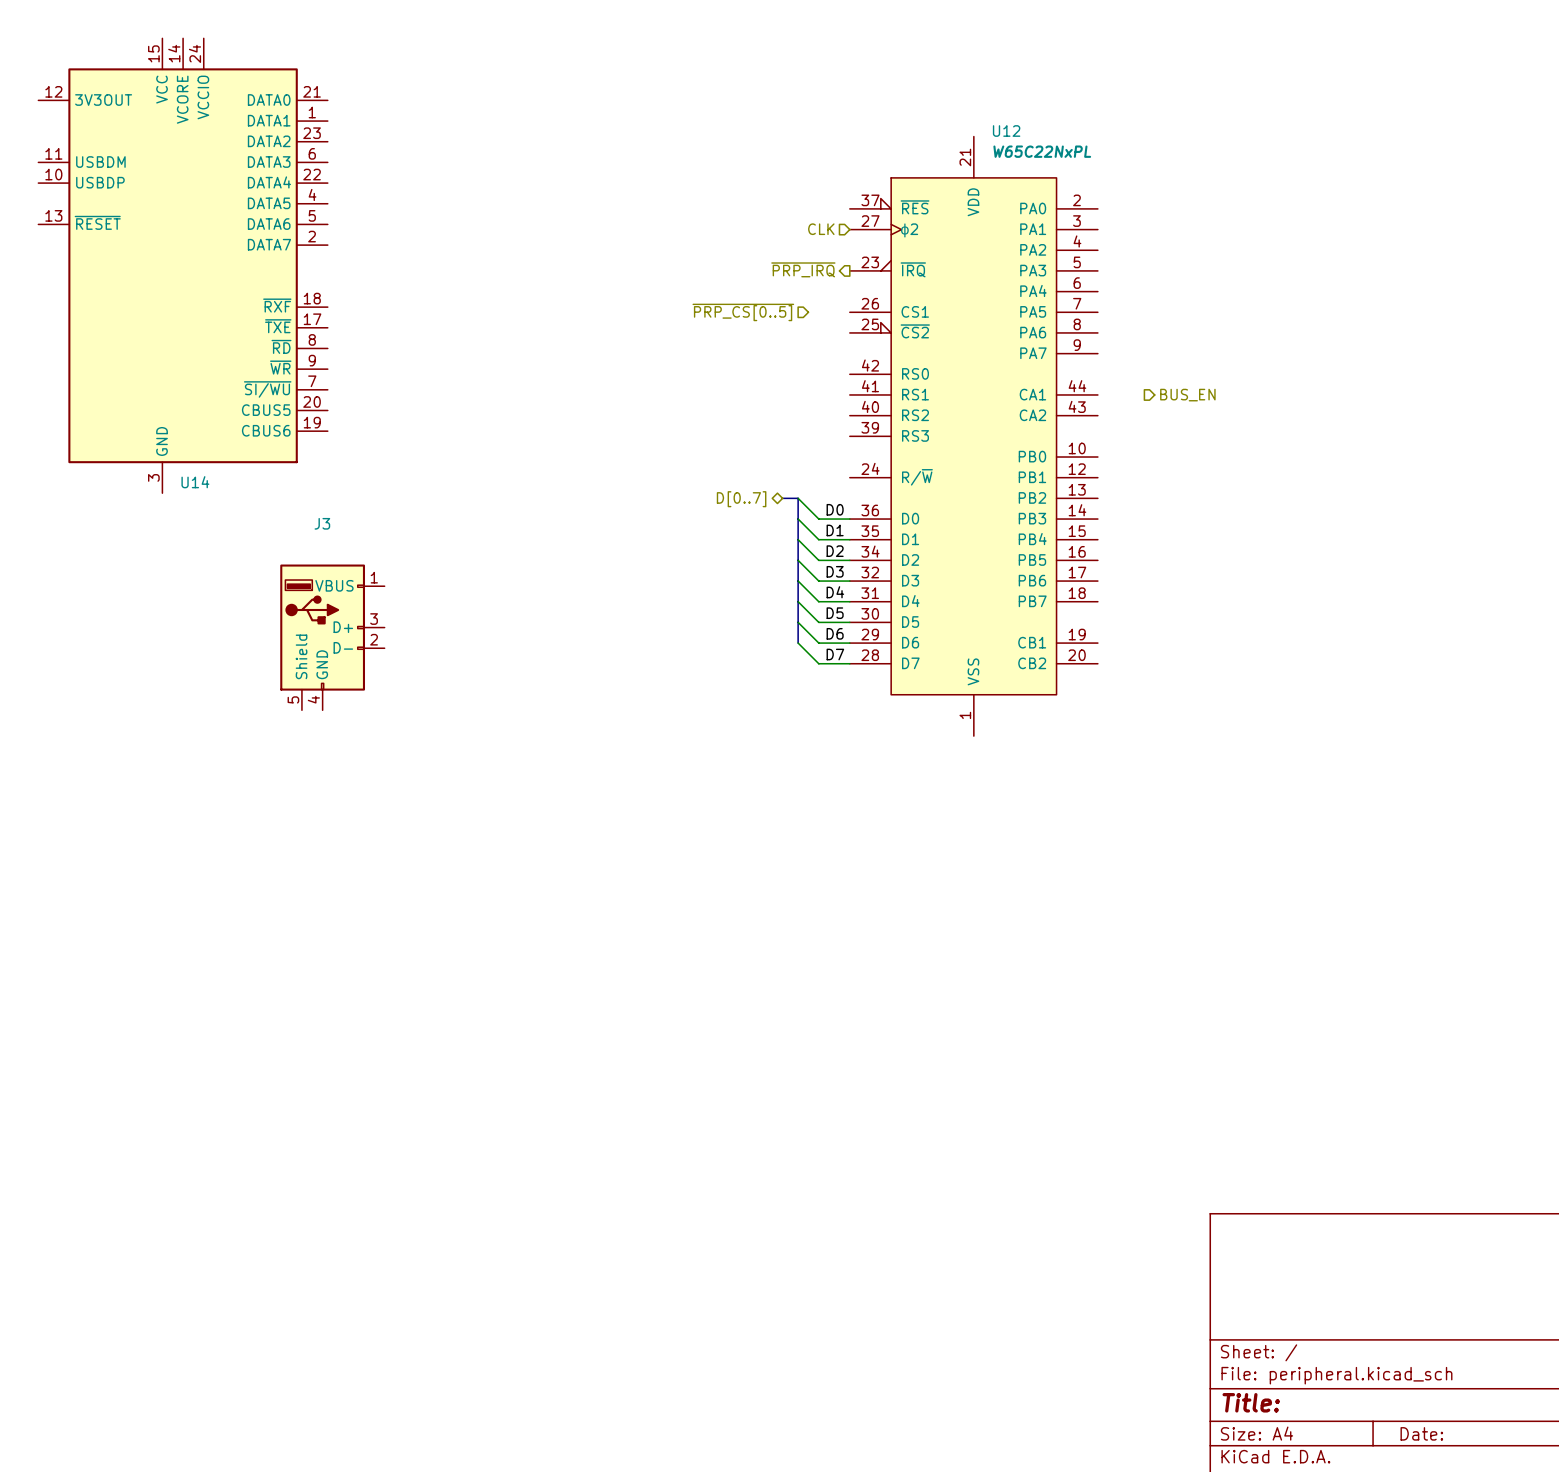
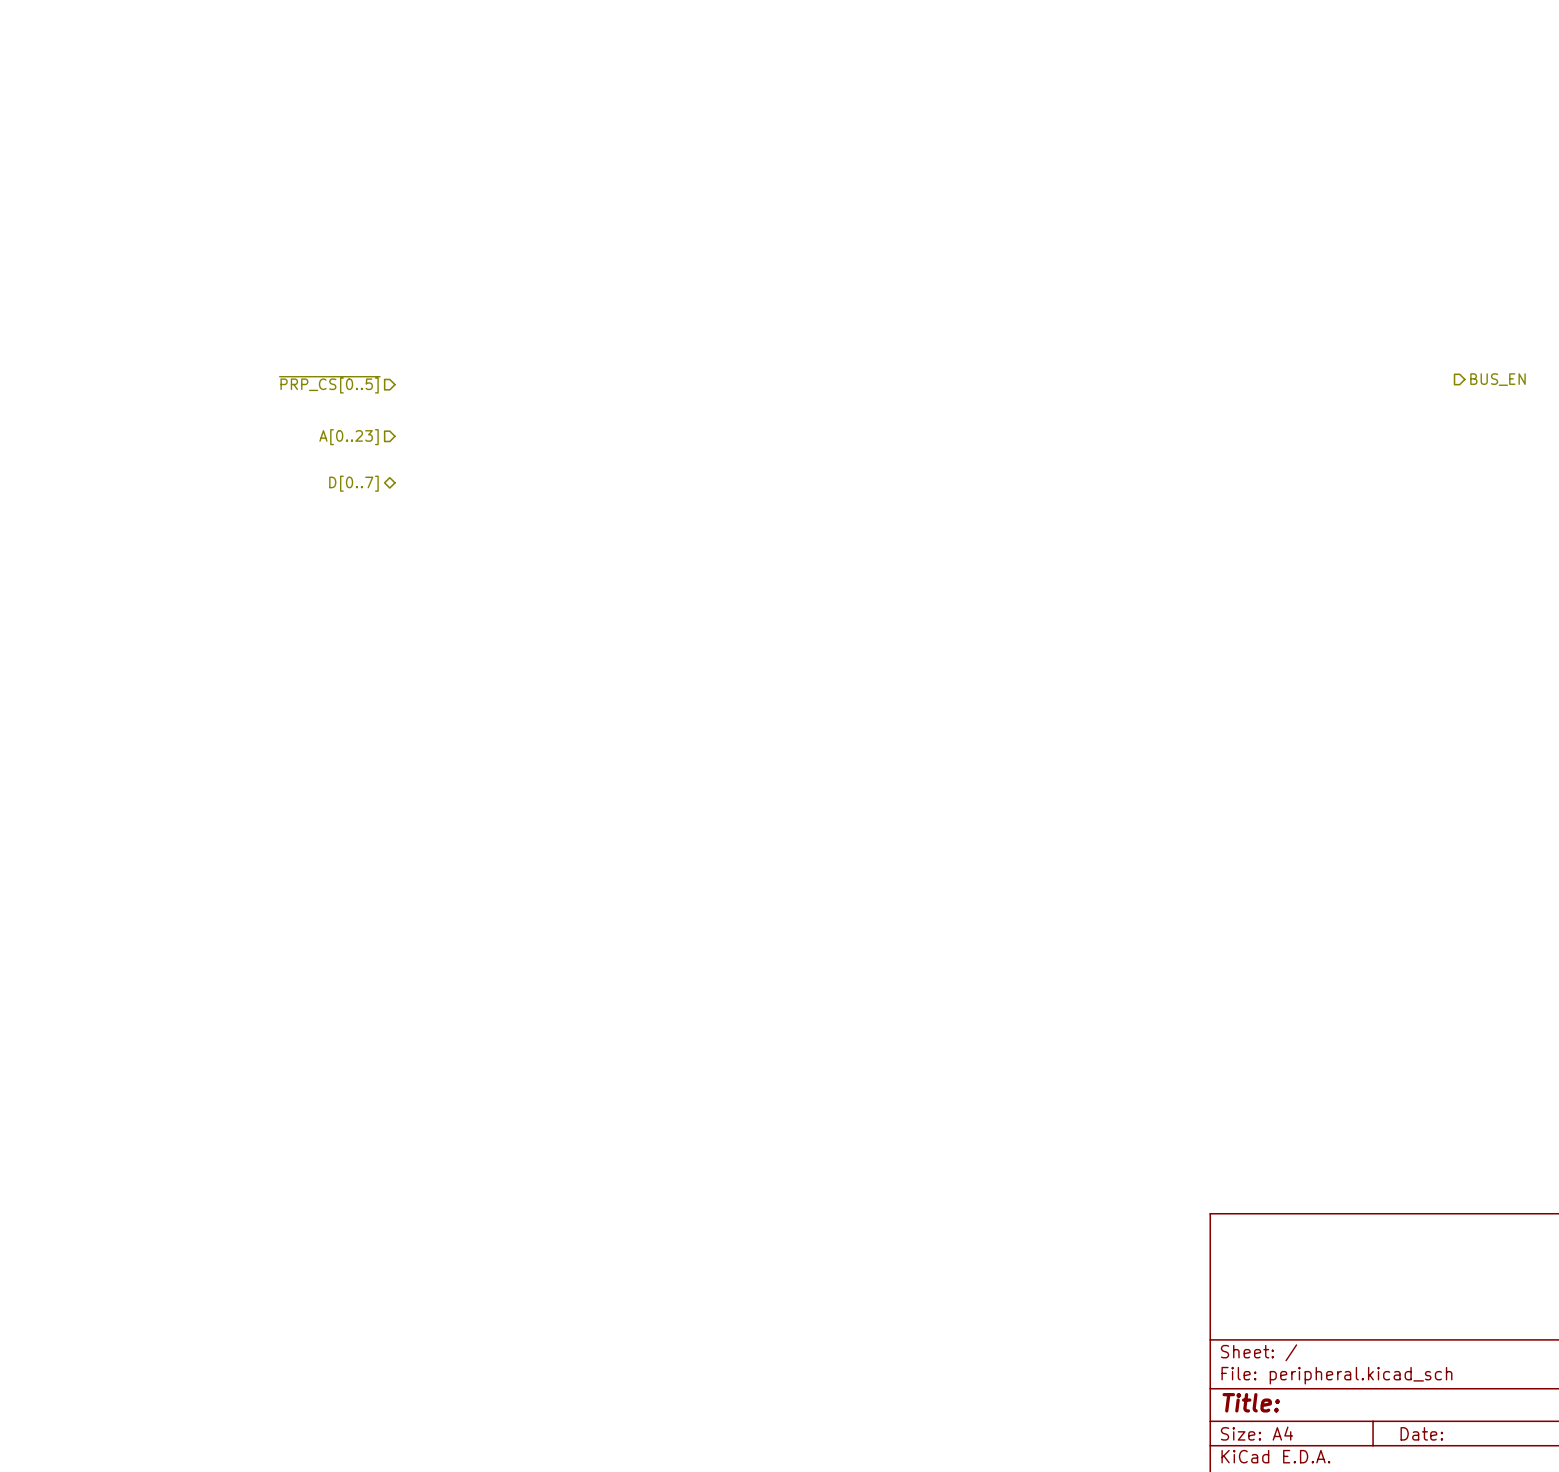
hierarchical label: CLK (821, 229) -> none
U14: (183, 265) -> none
hierarchical label: ~{PRP_IRQ} (803, 269) -> none
hierarchical label: ~{PRP_CS[0..5]} (743, 312) -> none
hierarchical label: none -> BUS_EN (1497, 379)
hierarchical label: none -> ~{PRP_CS[0..5]} (329, 384)
hierarchical label: BUS_EN (1187, 395) -> none
U12: W65C22NxPL (973, 436) -> none
hierarchical label: none -> A[0..23] (349, 437)
hierarchical label: none -> D[0..7] (353, 483)
bus: (782, 498) (798, 498) (798, 643) -> none
wire: (798, 498) (818, 519) -> none
hierarchical label: D[0..7] (741, 499) -> none
label: D0 (835, 509) -> none
wire: (798, 519) (818, 539) (849, 539) -> none
wire: (818, 519) (849, 519) -> none
label: D1 (835, 530) -> none
wire: (798, 539) (818, 560) -> none
label: D2 (835, 551) -> none
wire: (798, 560) (818, 581) (849, 581) -> none
wire: (818, 560) (849, 560) -> none
label: D3 (835, 571) -> none
wire: (798, 581) (818, 601) (849, 601) -> none
label: D4 (835, 592) -> none
wire: (798, 601) (818, 622) -> none
label: D5 (835, 613) -> none
wire: (798, 622) (818, 643) (849, 643) -> none
wire: (818, 622) (849, 622) -> none
label: D6 (835, 633) -> none
J3: (332, 637) -> none
wire: (798, 643) (818, 663) -> none
label: D7 (835, 654) -> none
wire: (818, 663) (849, 663) -> none

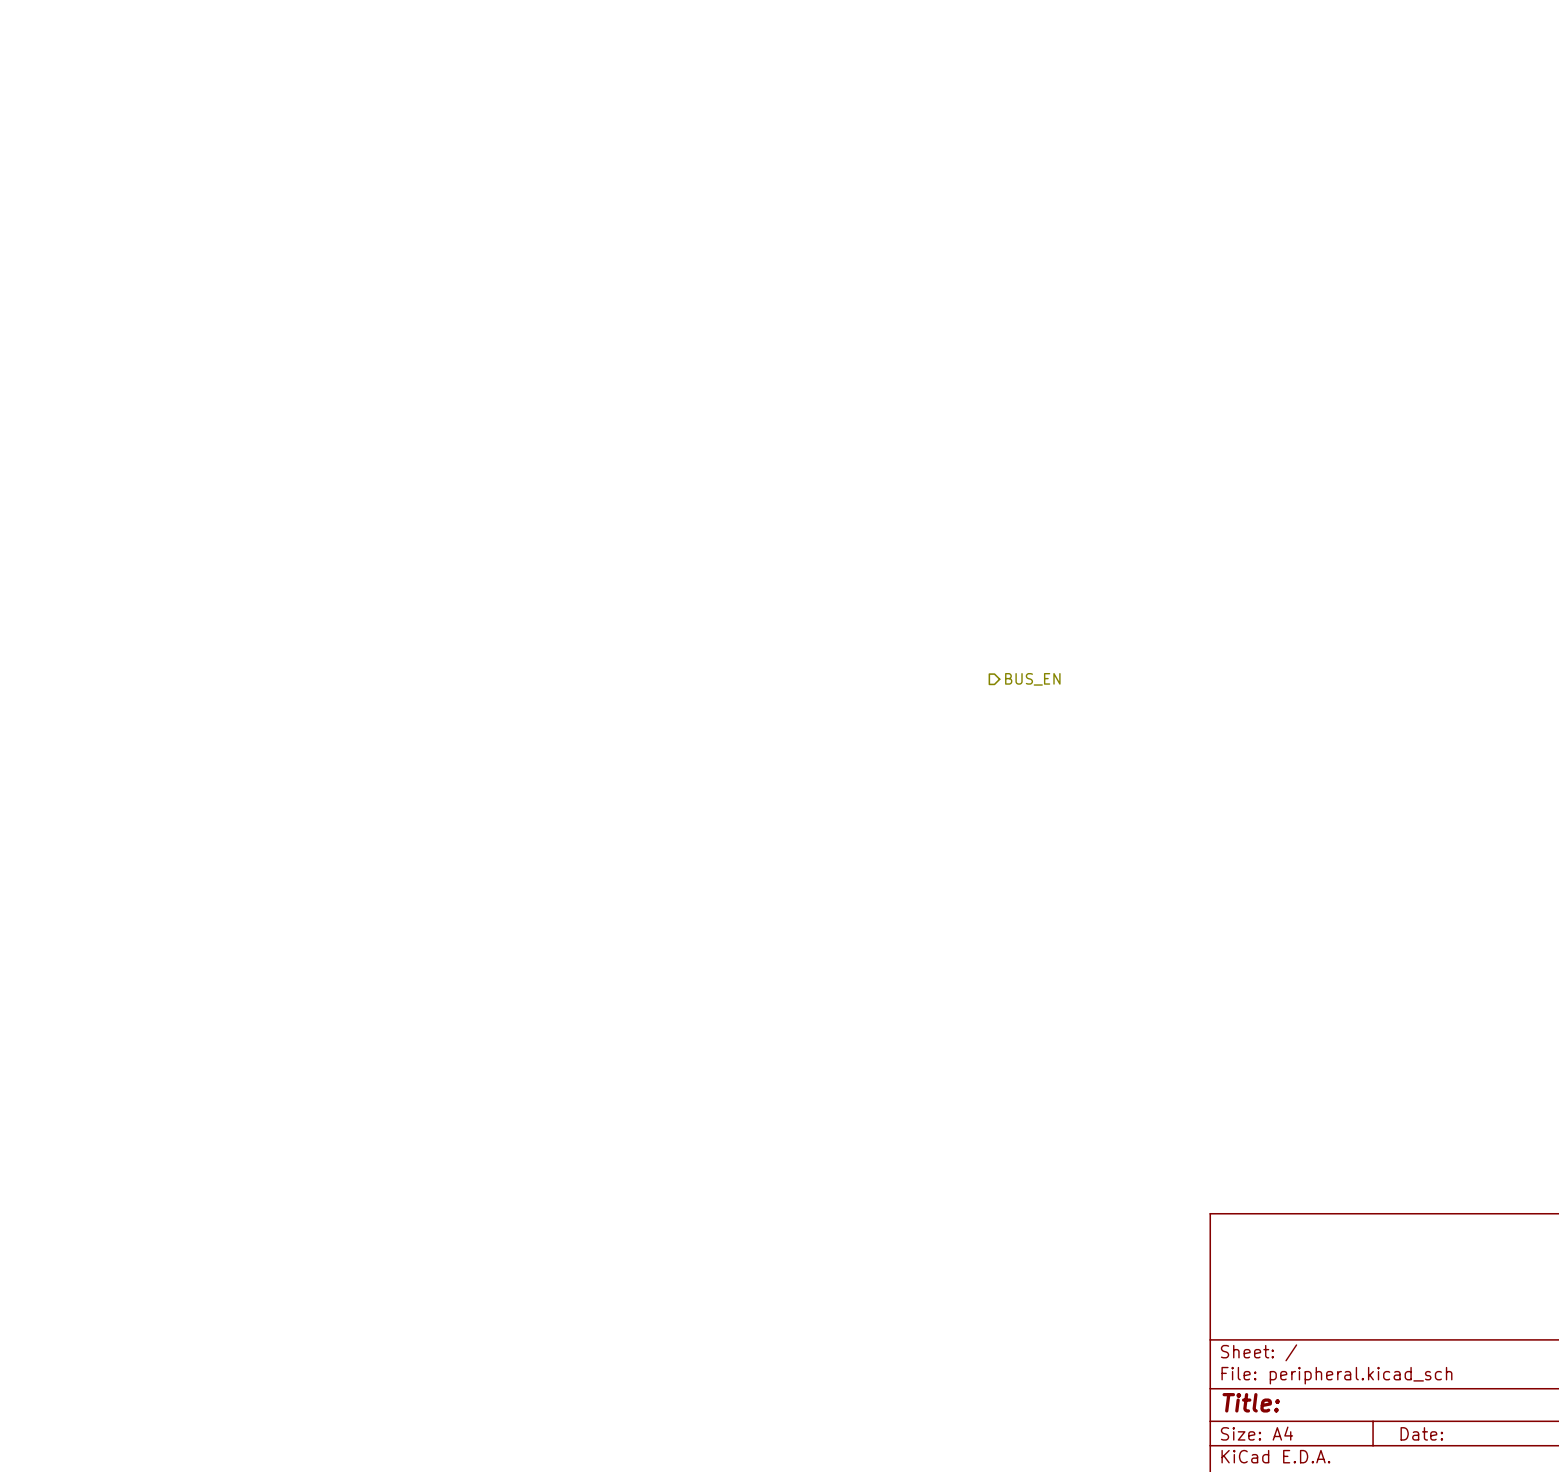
hierarchical label: BUS_EN (1497, 379) -> none
hierarchical label: ~{PRP_CS[0..5]} (329, 384) -> none
hierarchical label: A[0..23] (349, 437) -> none
hierarchical label: D[0..7] (353, 483) -> none
hierarchical label: none -> BUS_EN (1032, 679)

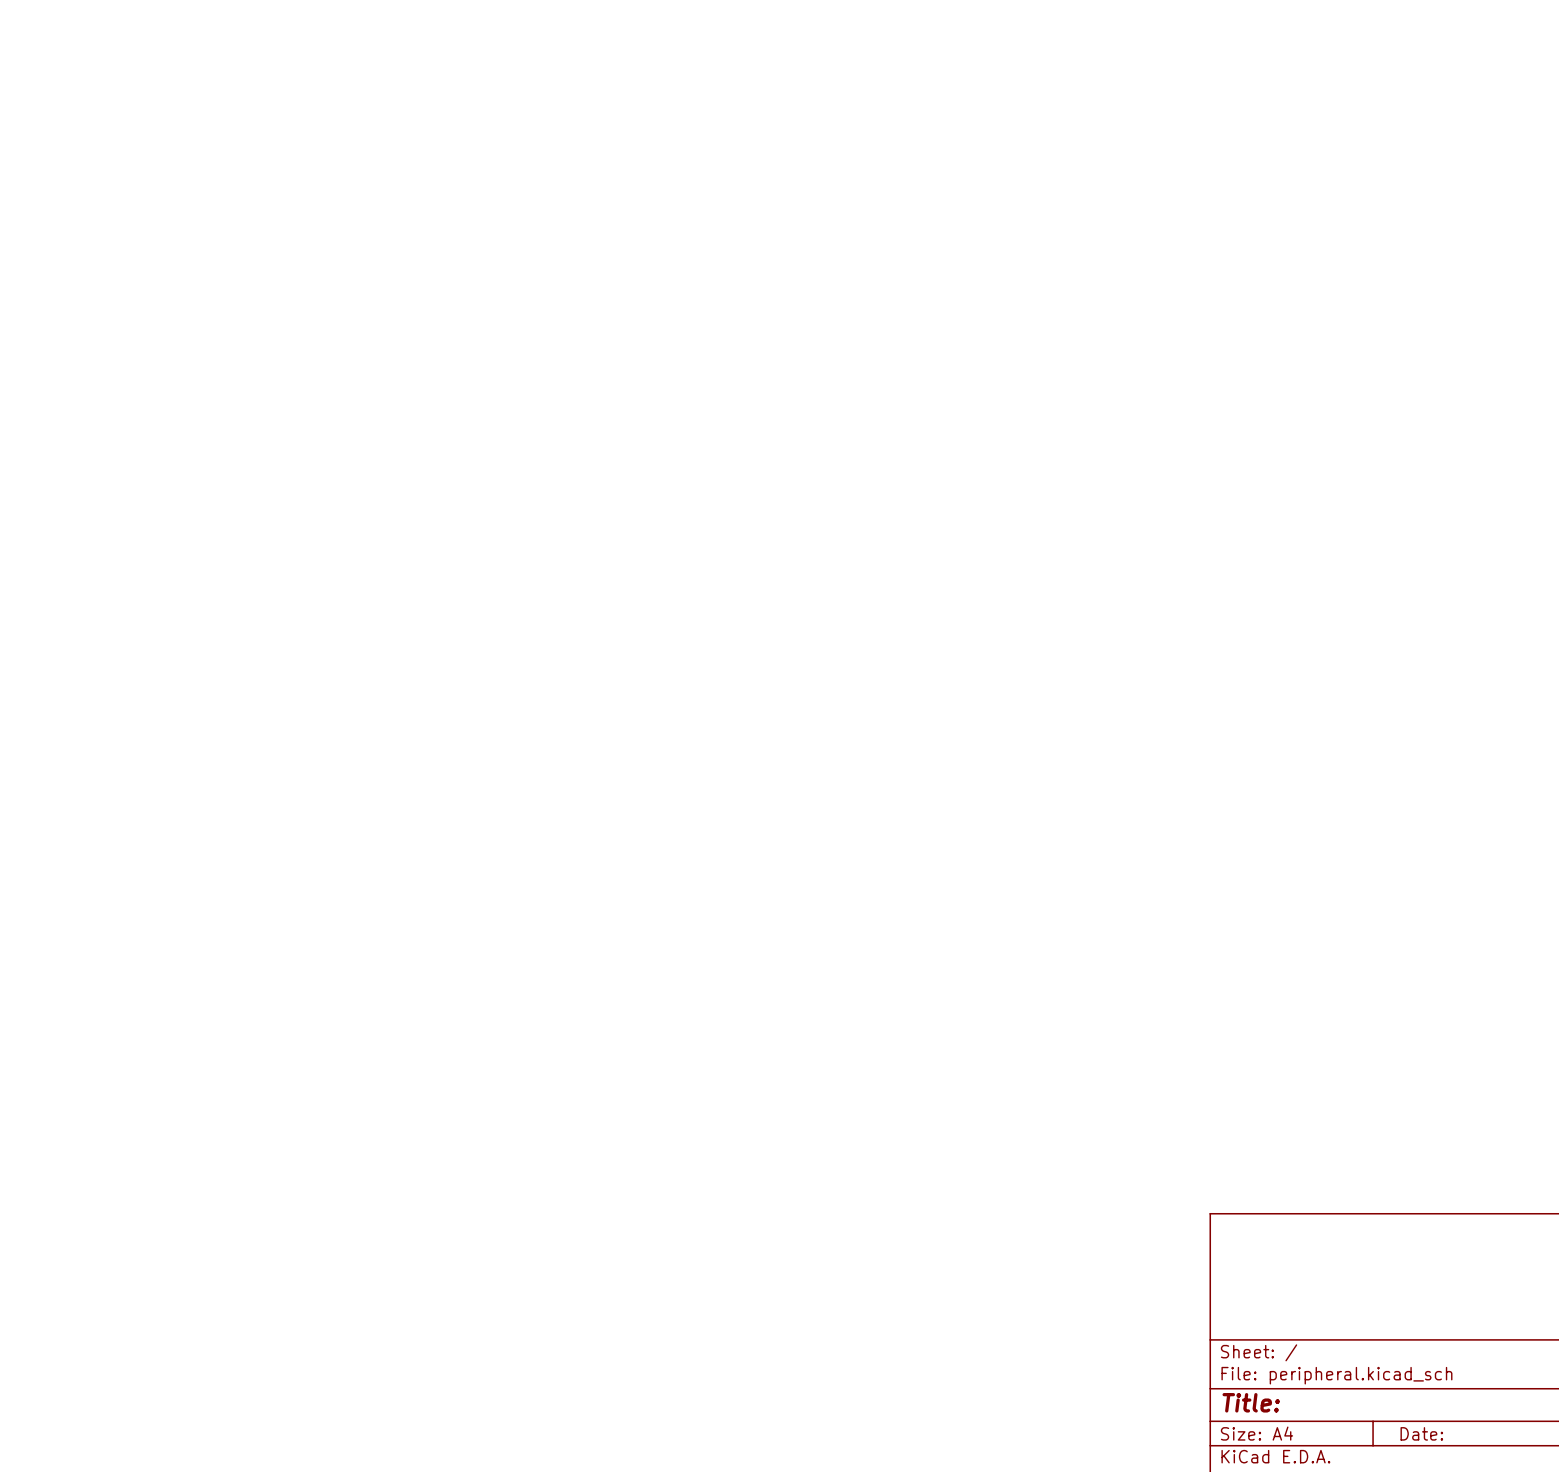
hierarchical label: BUS_EN (1032, 679) -> none

